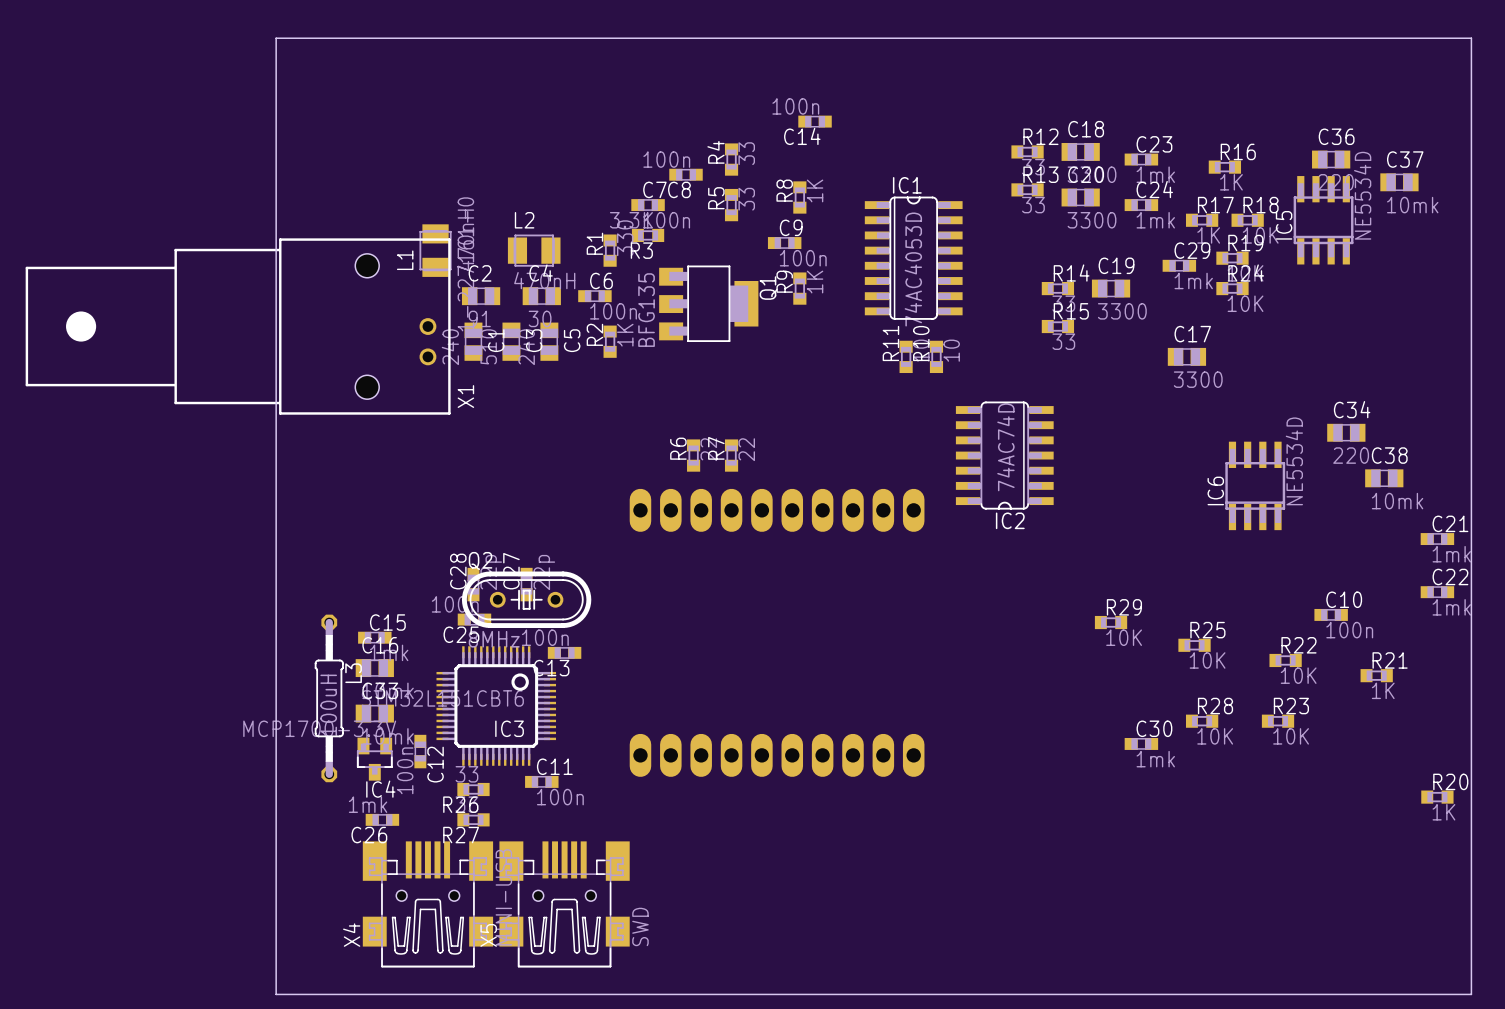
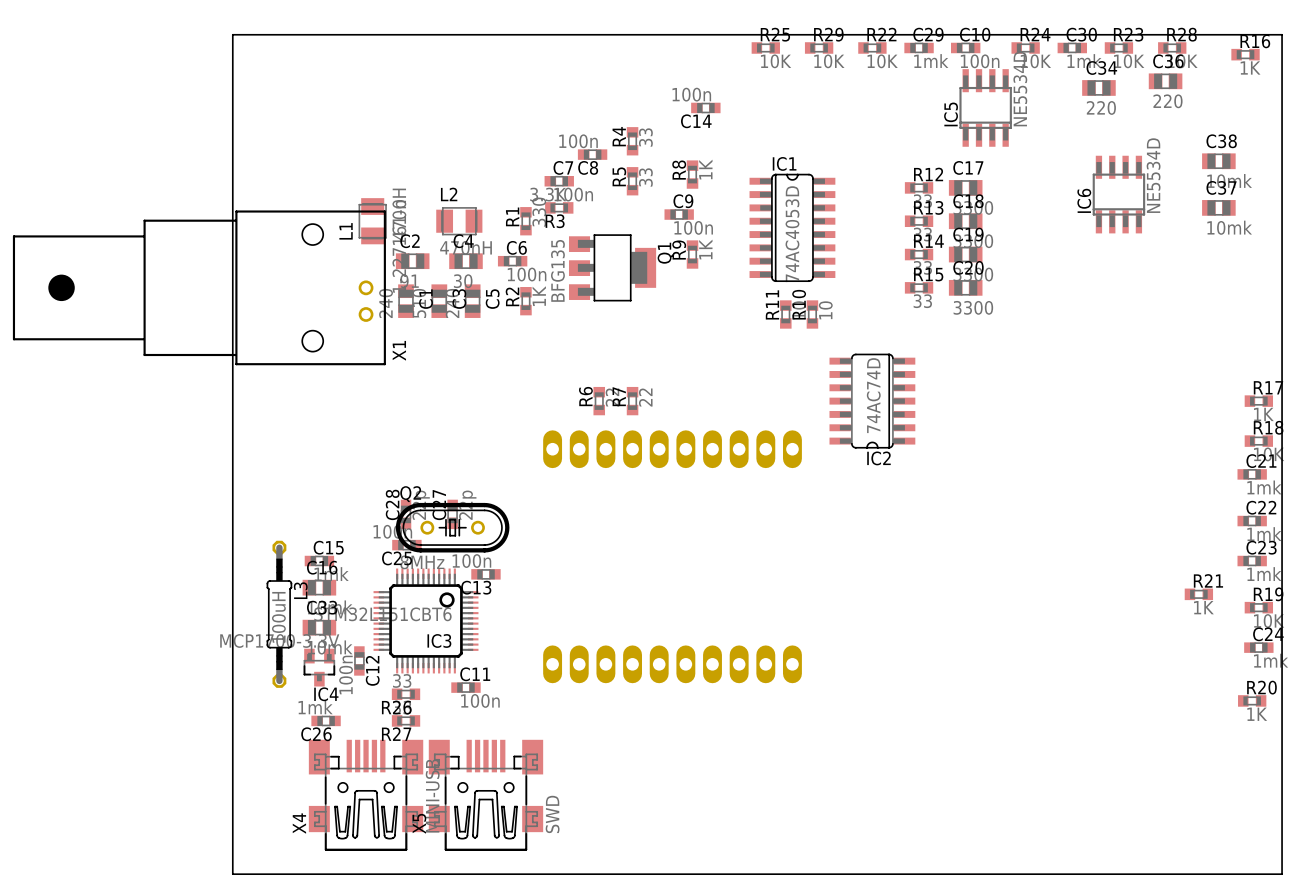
R12 position: (1027, 151) -> (919, 187)
C18 position: (1080, 151) -> (965, 221)
C23 position: (1141, 159) -> (1252, 561)
C36 position: (1331, 159) -> (1165, 81)
C37 name: C37 (1405, 159) -> C38 (1221, 141)
R16 position: (1224, 167) -> (1245, 54)
R13 position: (1027, 189) -> (919, 221)
C20 position: (1080, 197) -> (965, 287)
C24 position: (1141, 205) -> (1258, 647)
R17 position: (1202, 220) -> (1258, 401)
R18 position: (1247, 220) -> (1258, 441)
IC5 position: (1323, 220) -> (985, 107)
C37: none -> 10mk (1218, 207)
R19 position: (1232, 258) -> (1258, 607)
C29 position: (1179, 265) -> (919, 47)
R24 position: (1232, 288) -> (1025, 47)
C17 position: (1186, 356) -> (965, 187)
C34 position: (1346, 432) -> (1098, 87)
C38: 10mk (1384, 478) -> none
IC6 position: (1255, 485) -> (1118, 194)
C10 position: (1331, 614) -> (965, 47)
R29 position: (1111, 622) -> (819, 47)
R25 position: (1194, 645) -> (765, 47)
R22 position: (1285, 660) -> (872, 47)
R28 position: (1202, 721) -> (1172, 47)
R23 position: (1278, 721) -> (1118, 47)
C30 position: (1141, 743) -> (1072, 47)

